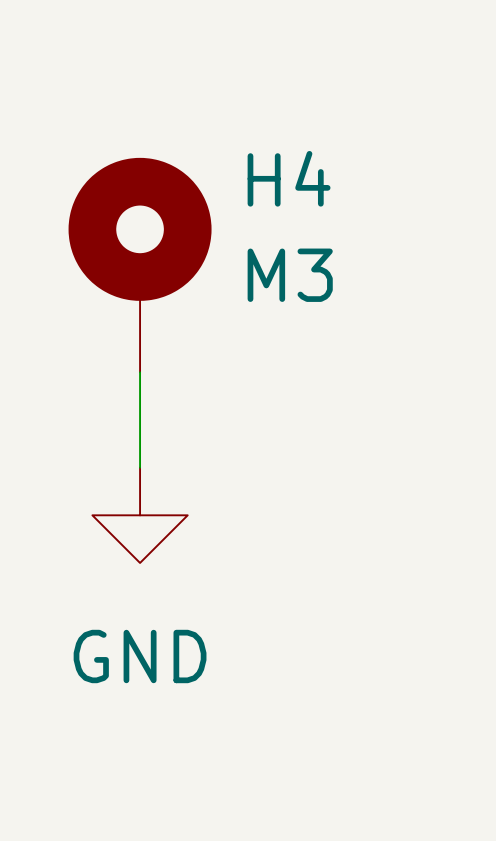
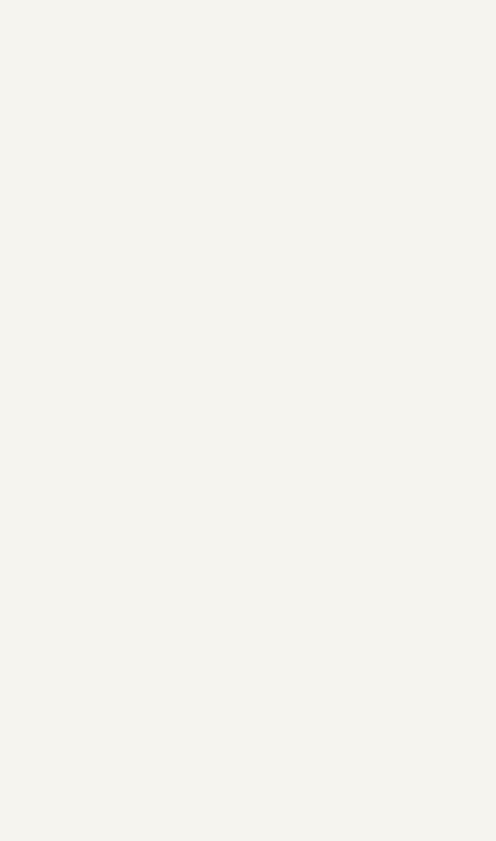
H4: M3 (140, 265) -> none
wire: (140, 372) (140, 467) -> none
power symbol: GND (140, 515) -> none

